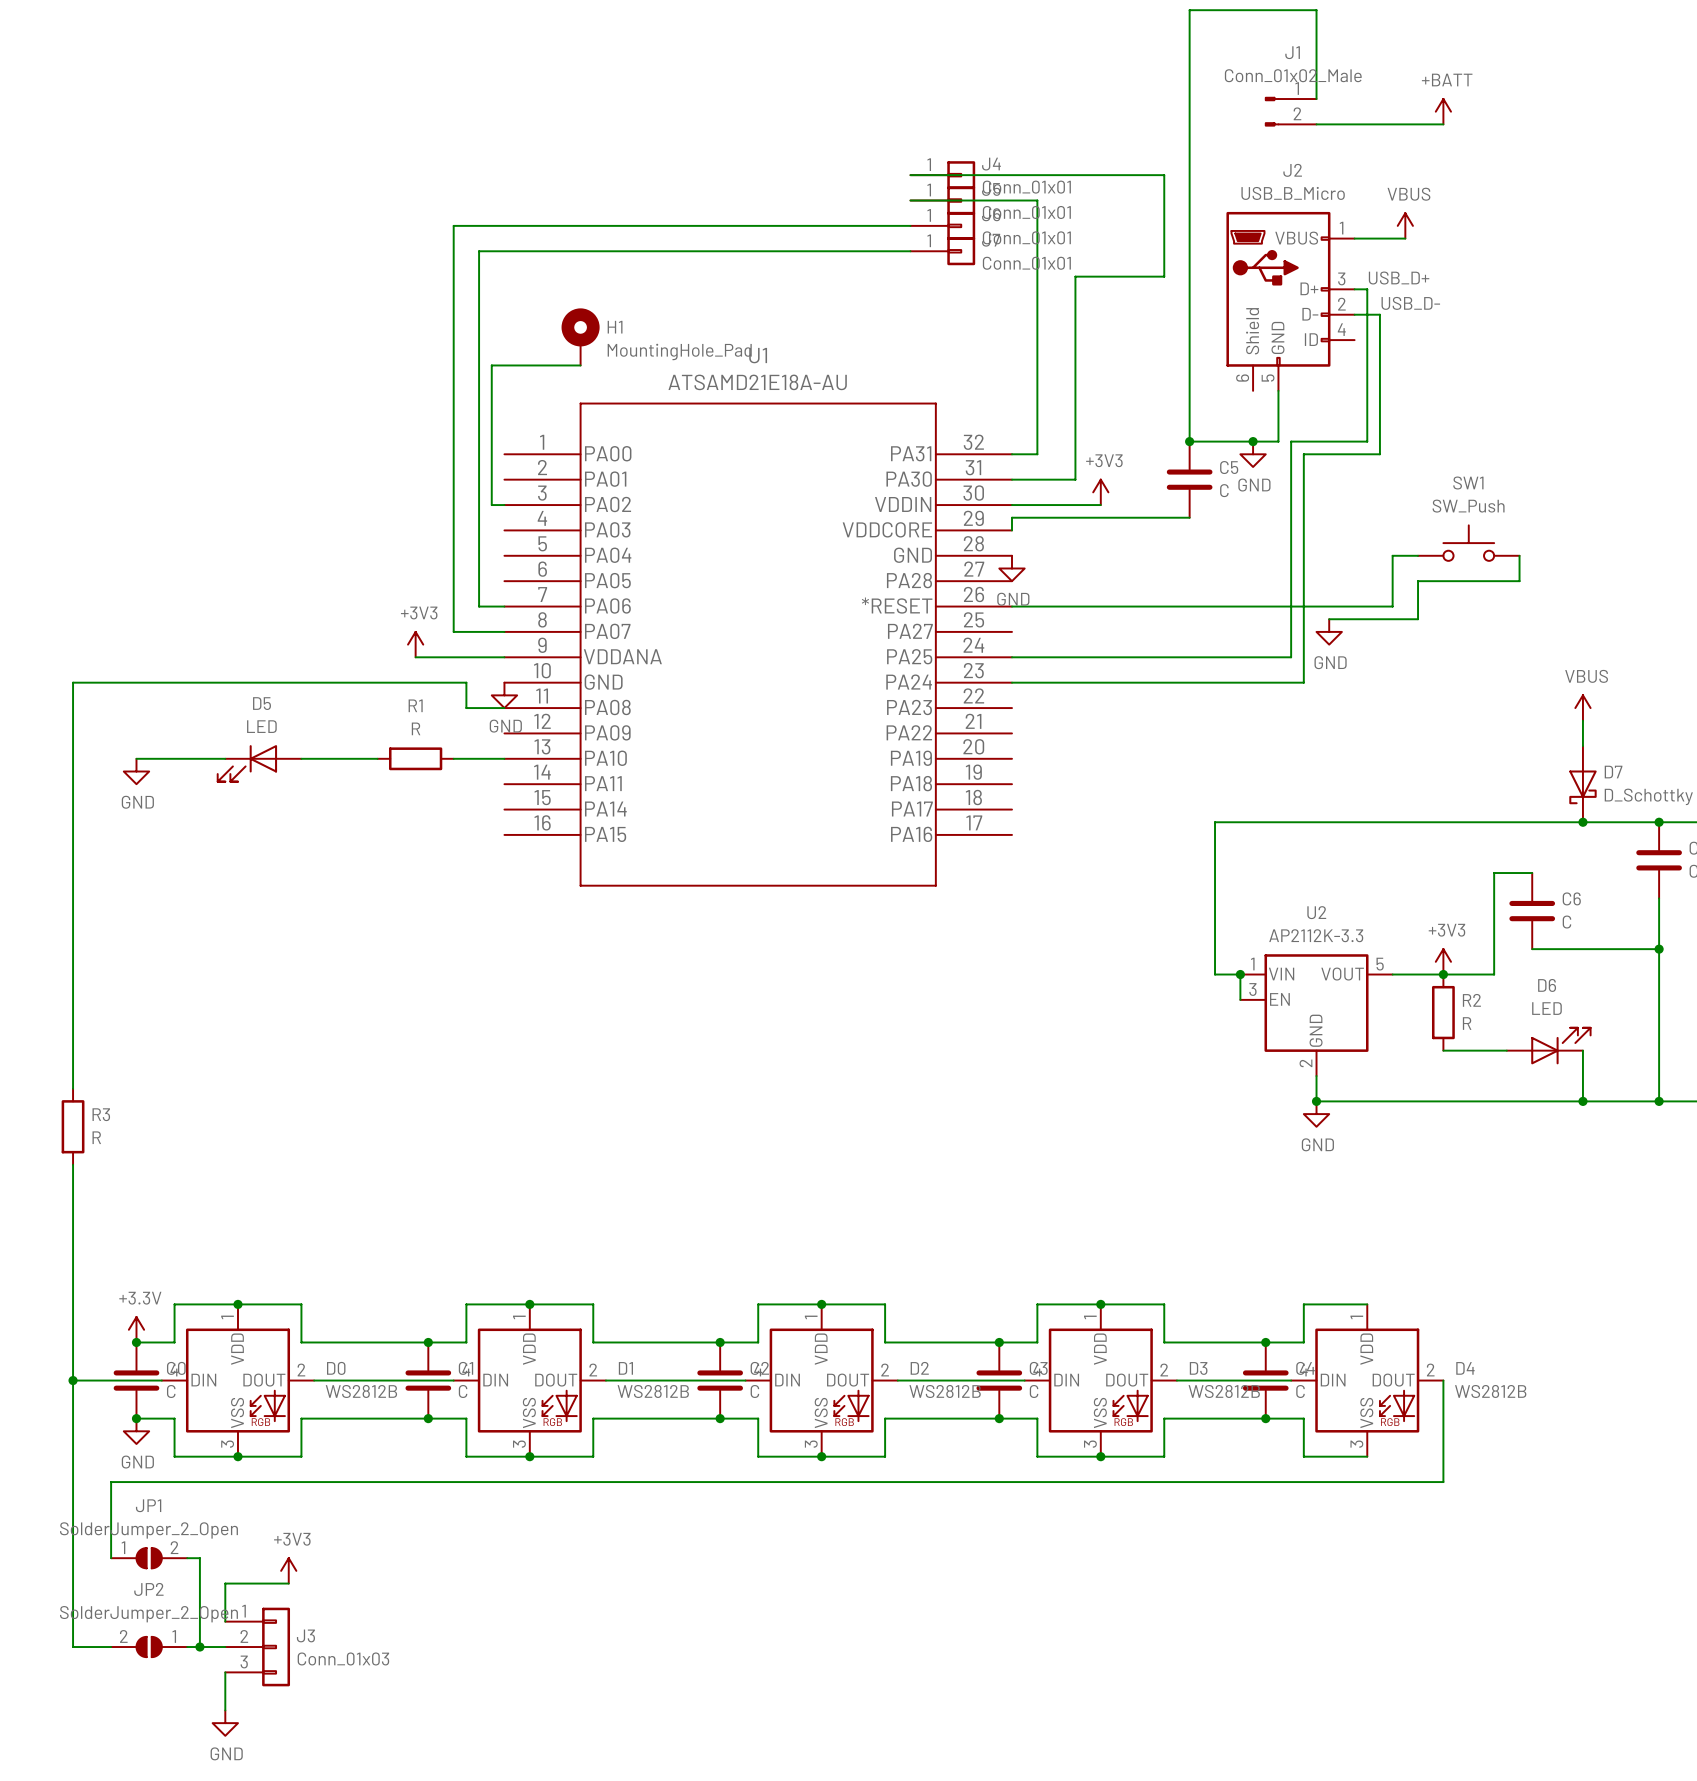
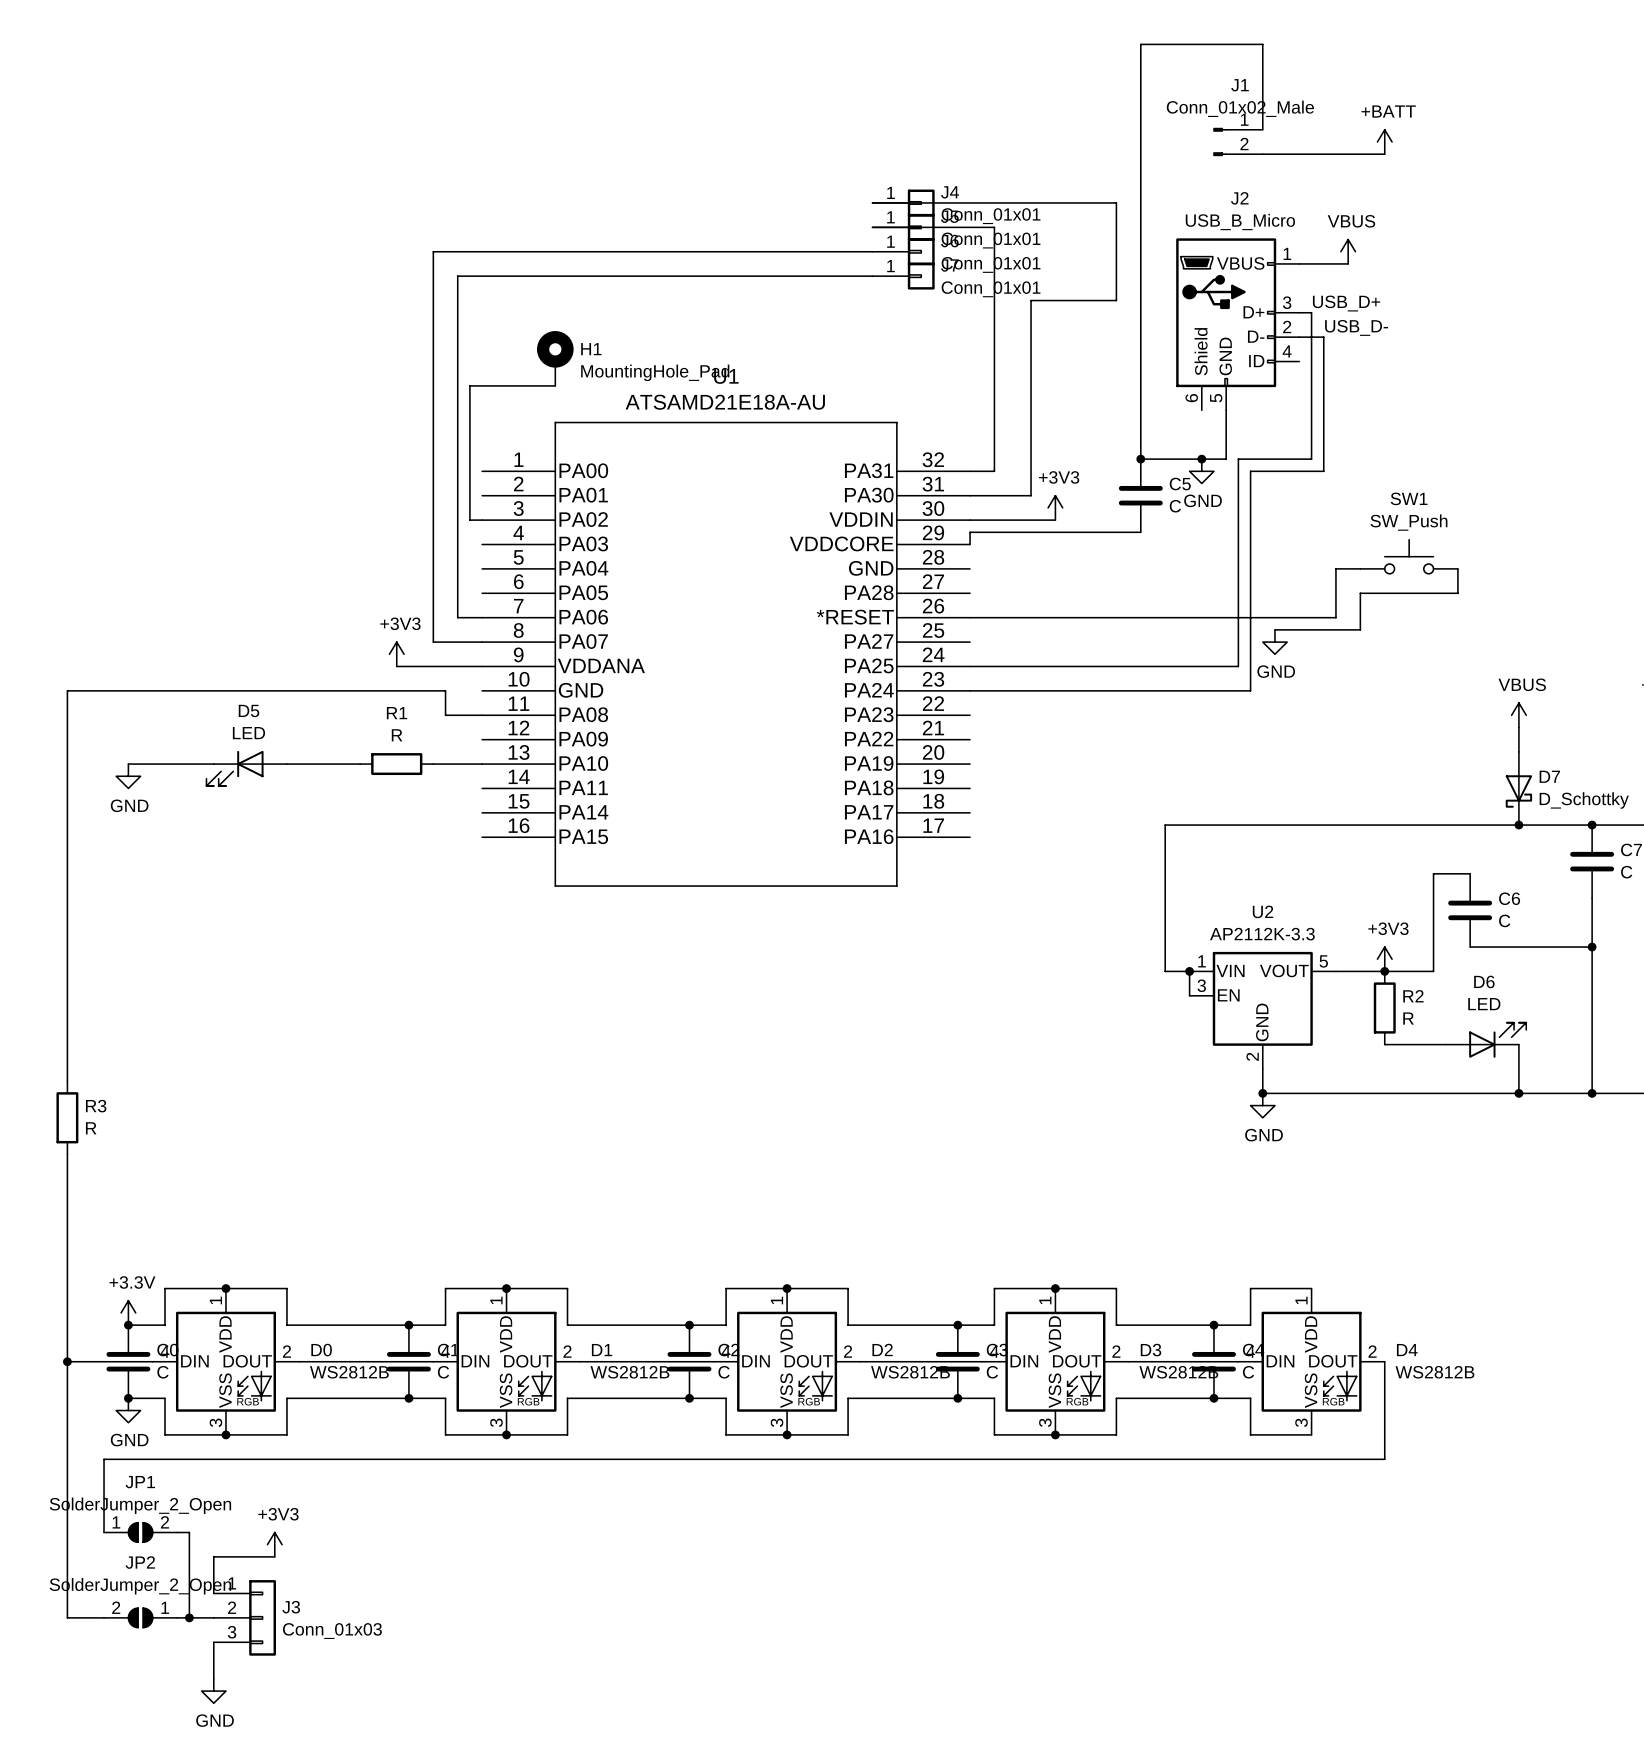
power symbol: GND (1011, 568) -> none
power symbol: GND (504, 695) -> none

